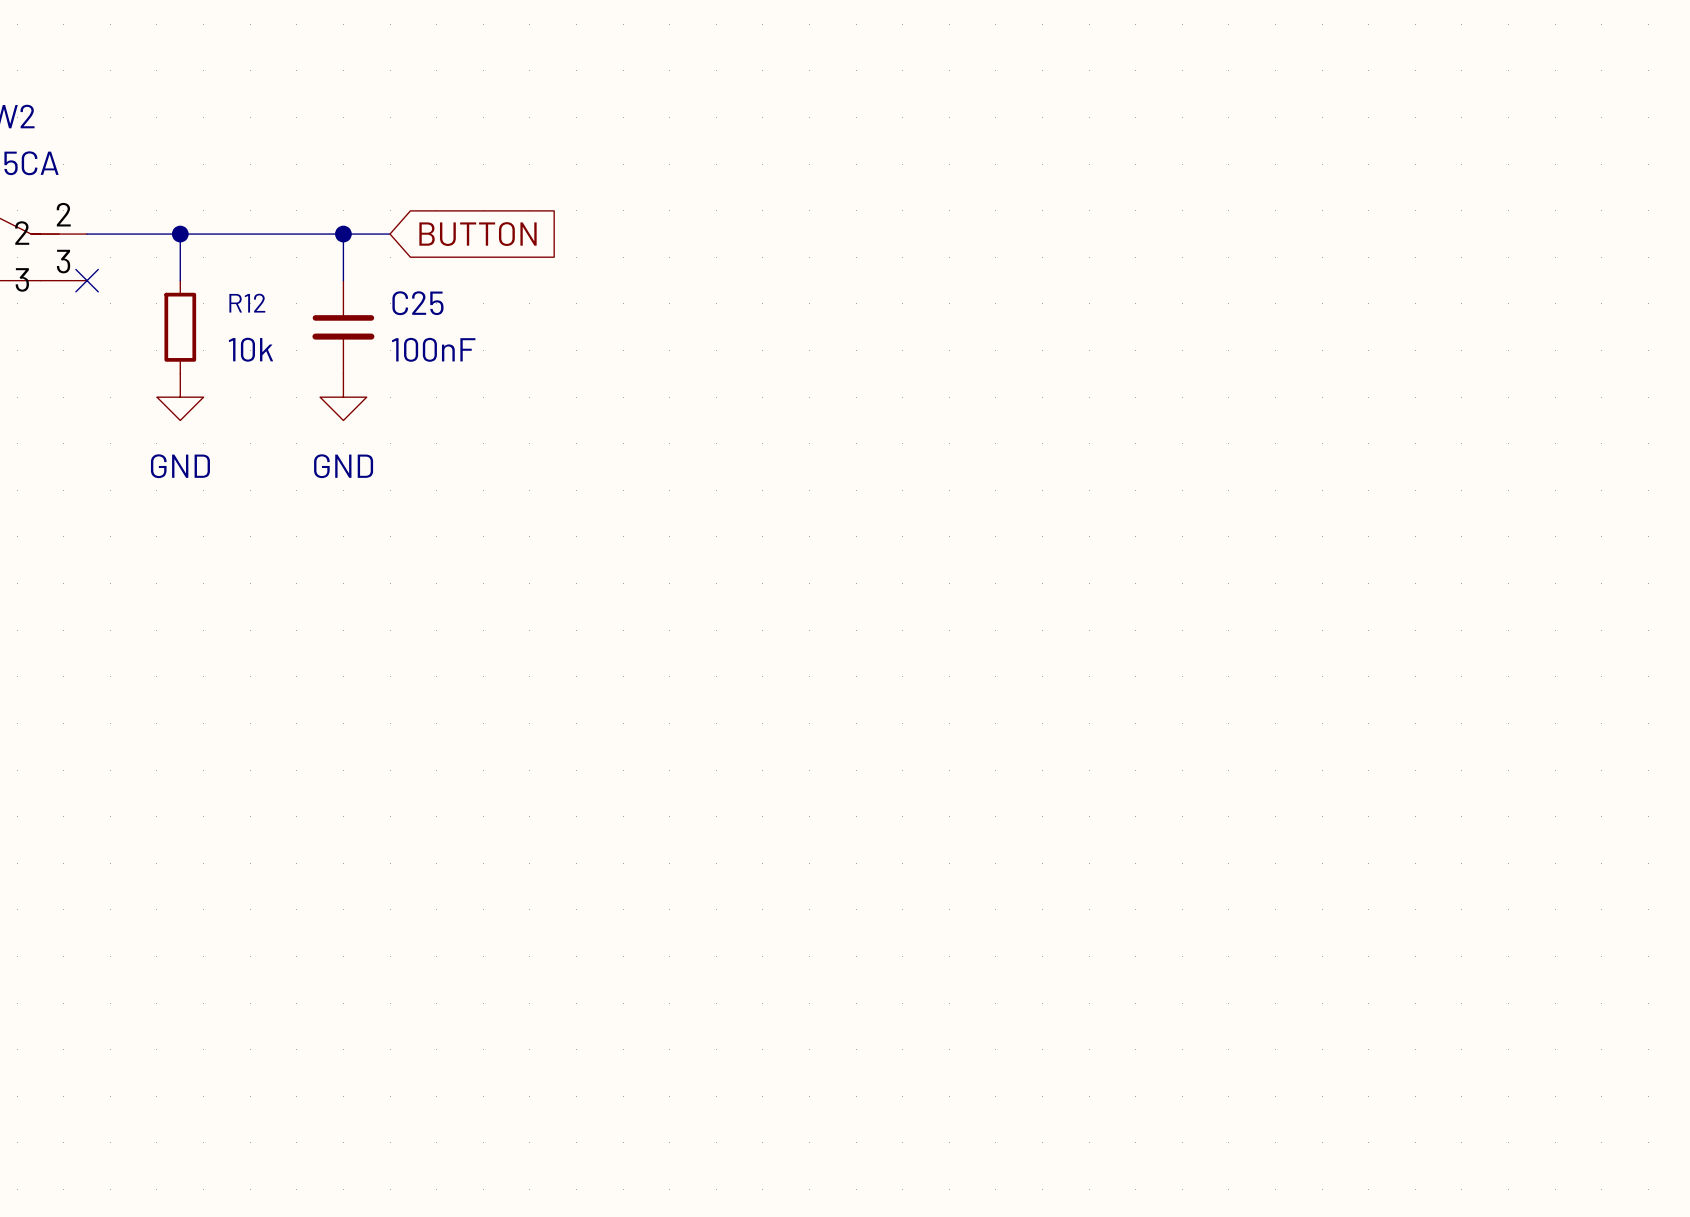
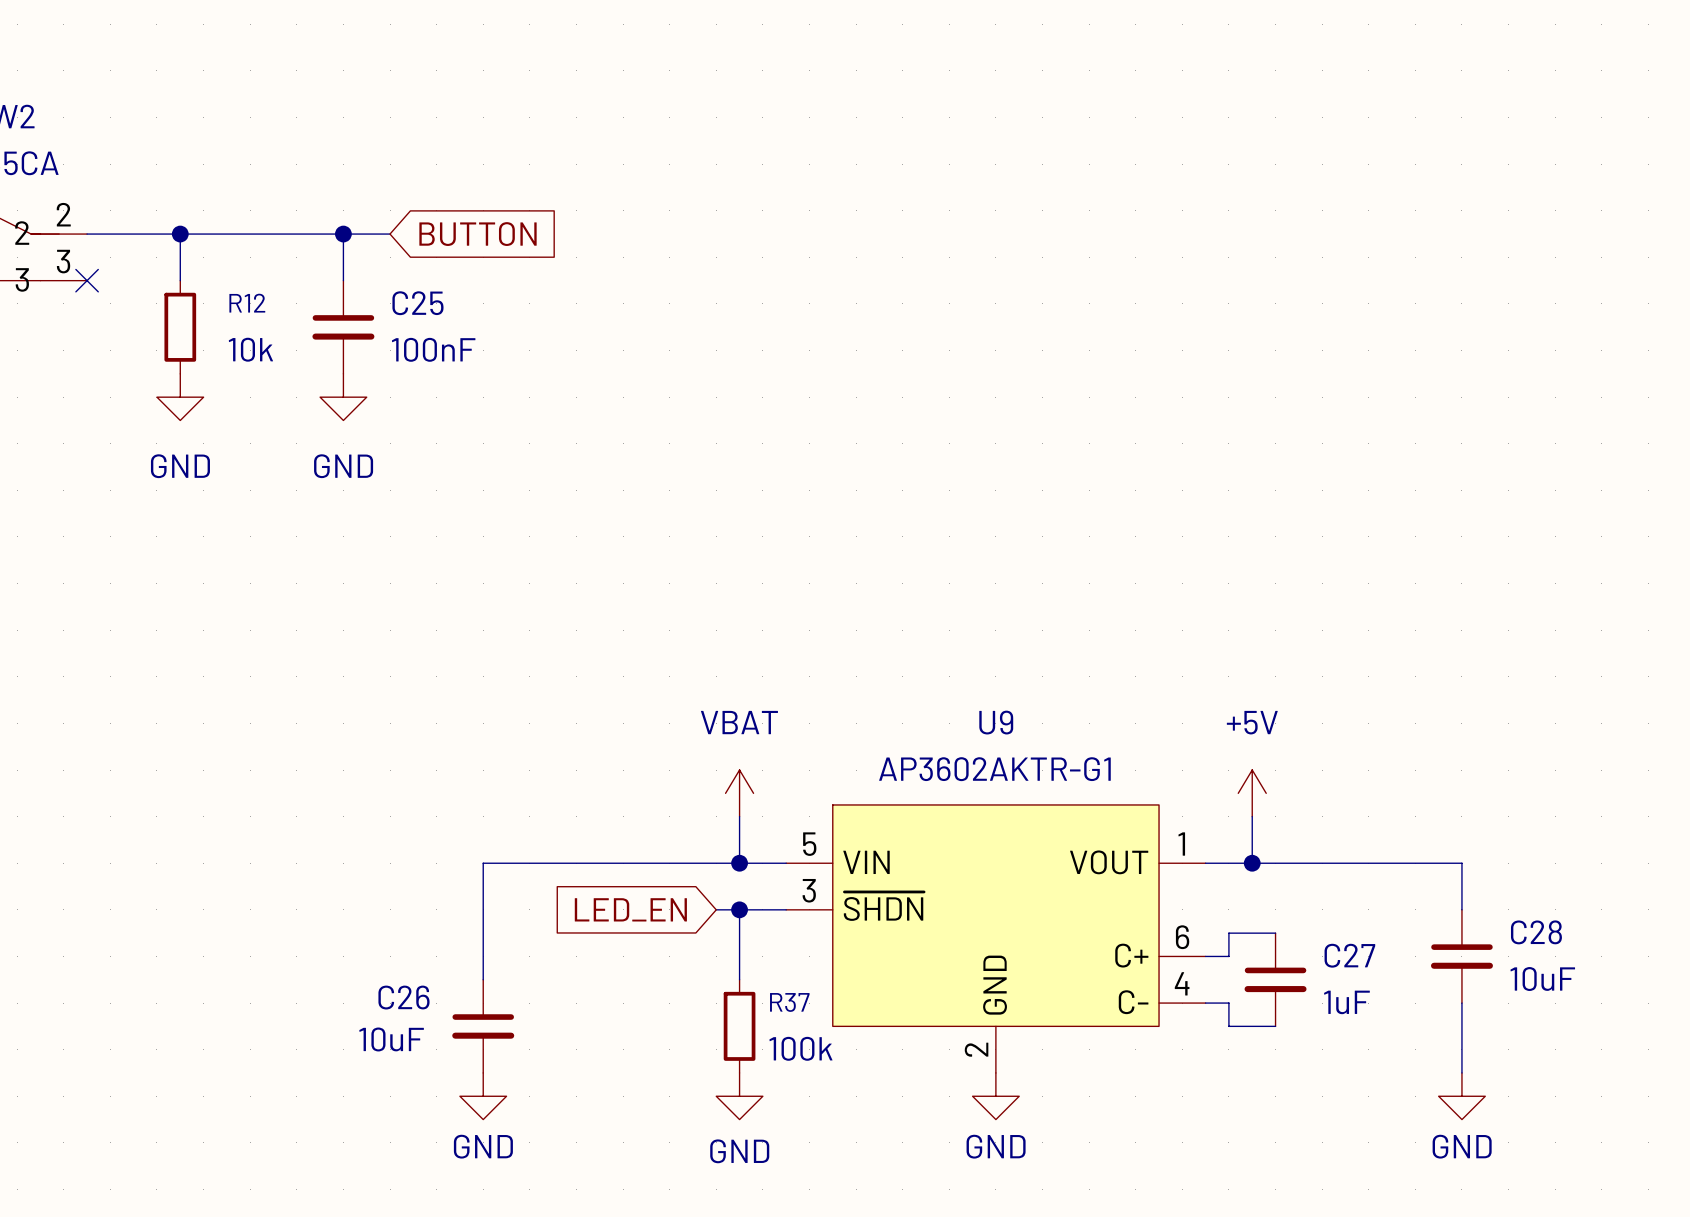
power symbol: none -> VBAT (739, 793)
power symbol: none -> +5V (1252, 793)
wire: none -> (739, 816) (739, 863)
wire: none -> (1252, 816) (1252, 863)
junction: none -> (739, 863)
wire: none -> (786, 863) (483, 863) (483, 979)
wire: none -> (1205, 863) (1461, 863) (1461, 909)
junction: none -> (1252, 863)
global label: none -> LED_EN (630, 909)
wire: none -> (716, 909) (786, 909)
wire: none -> (739, 909) (739, 979)
junction: none -> (739, 909)
wire: none -> (1275, 933) (1228, 933) (1228, 956) (1205, 956)
U9: none -> AP3602AKTR-G1 (995, 938)
C28: none -> 10uF (1461, 956)
C27: none -> 1uF (1275, 979)
wire: none -> (1205, 1003) (1228, 1003) (1228, 1026) (1275, 1026)
wire: none -> (1461, 1003) (1461, 1072)
C26: none -> 10uF (483, 1026)
R37: none -> 100k (739, 1026)
power symbol: none -> GND (483, 1096)
power symbol: none -> GND (739, 1096)
power symbol: none -> GND (995, 1096)
power symbol: none -> GND (1461, 1096)

